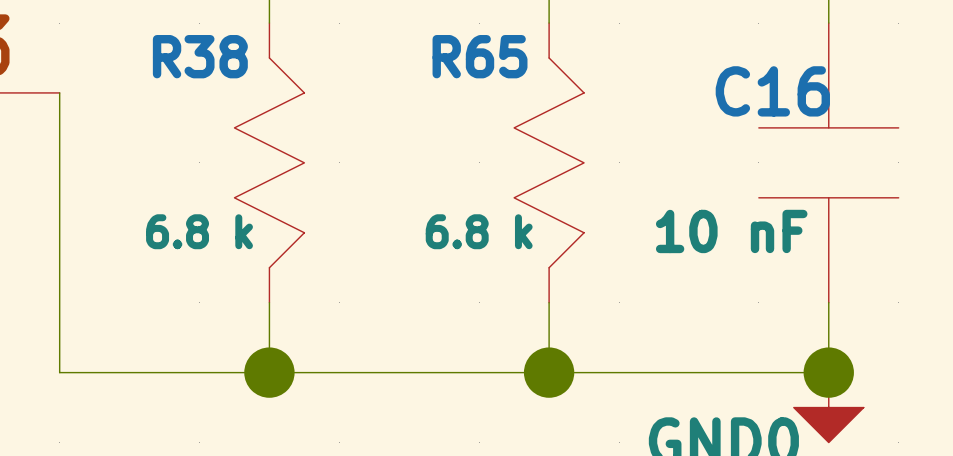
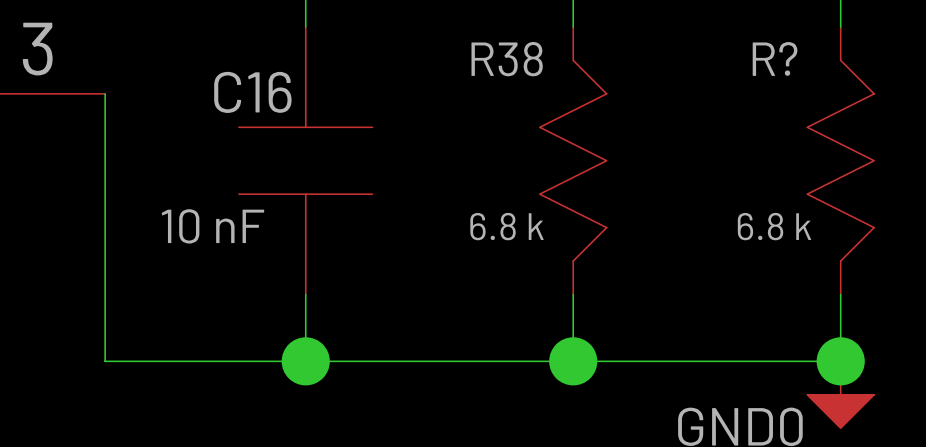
R65 name: R65 (480, 56) -> R38 (507, 59)
R38: 6.8 k (269, 162) -> none
C16 position: (828, 162) -> (305, 160)
R?: none -> 6.8 k (840, 160)

